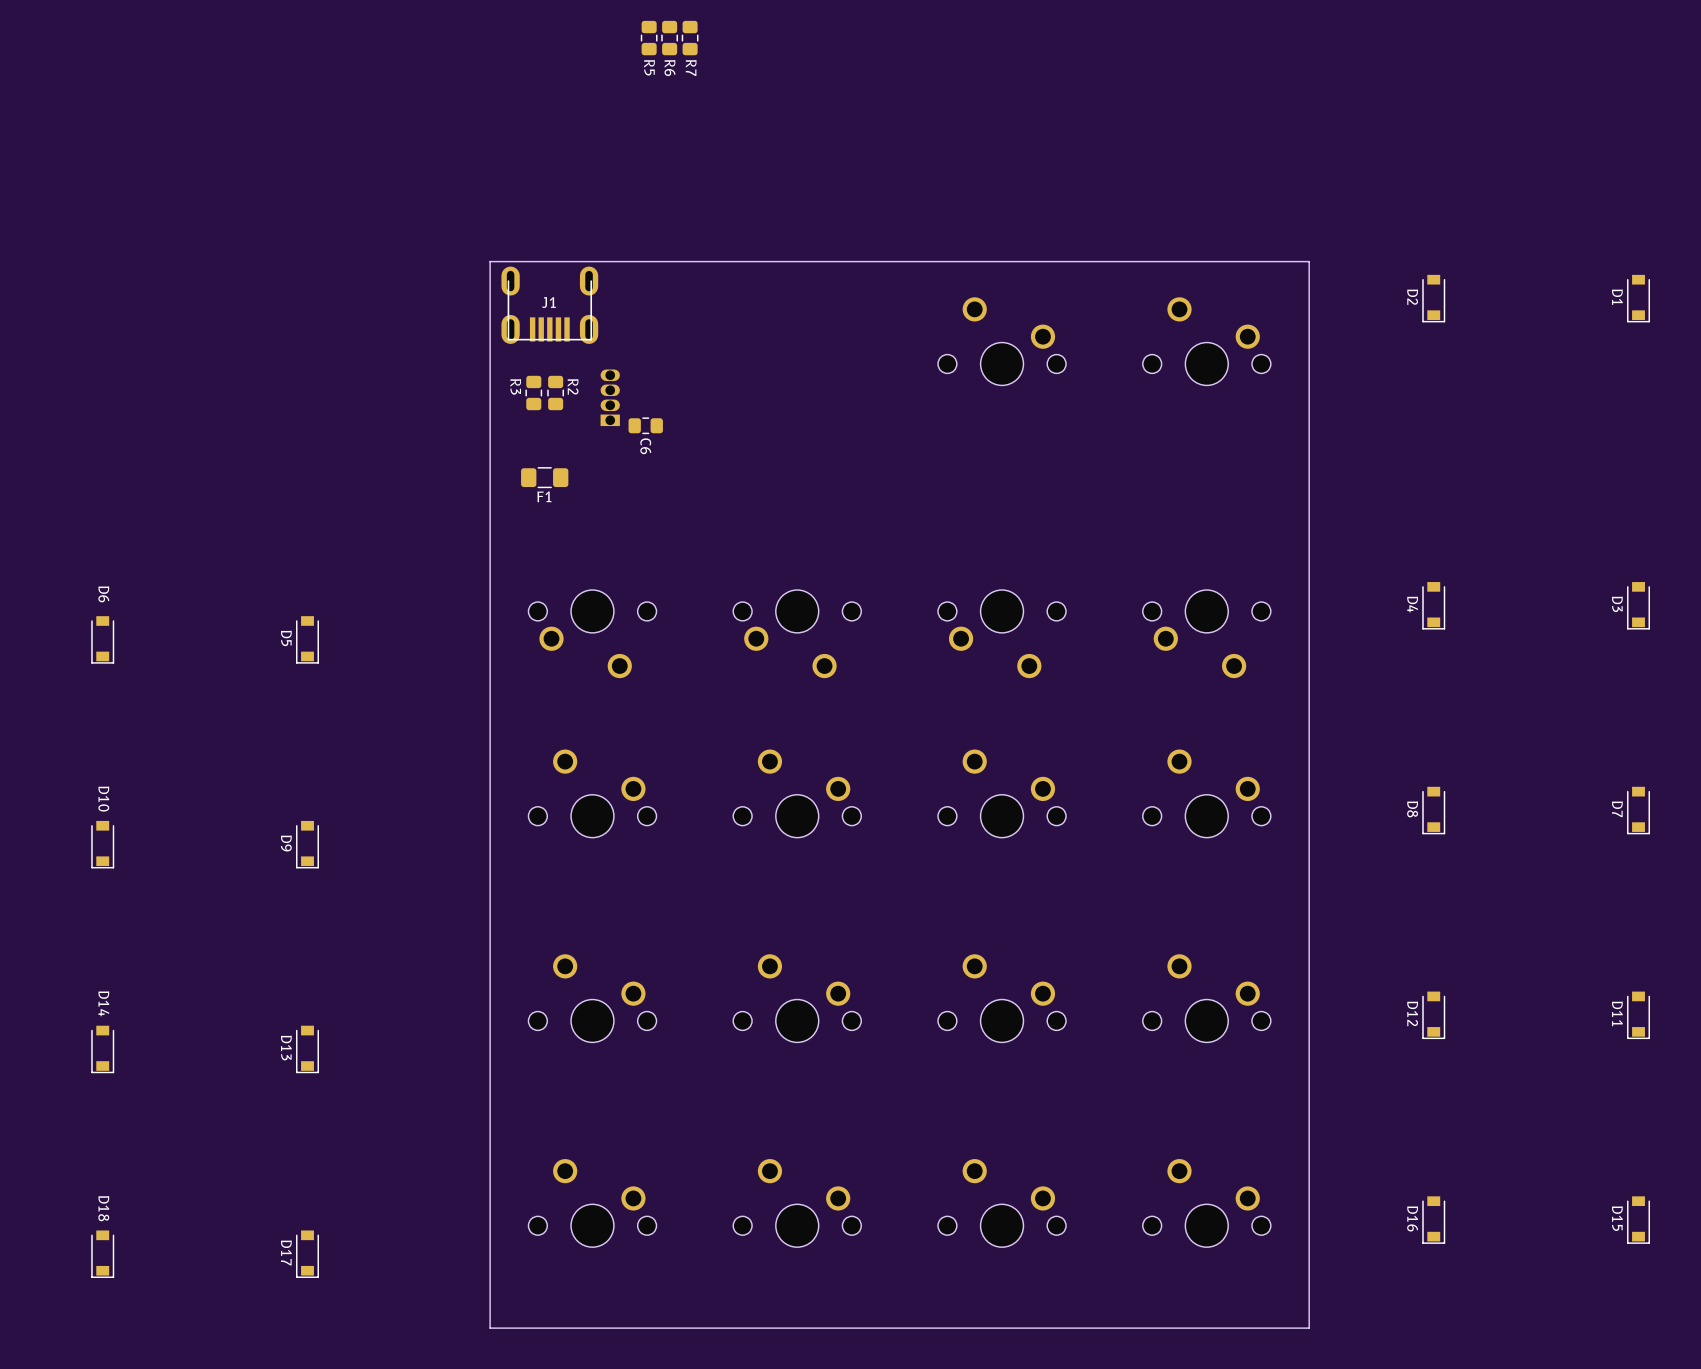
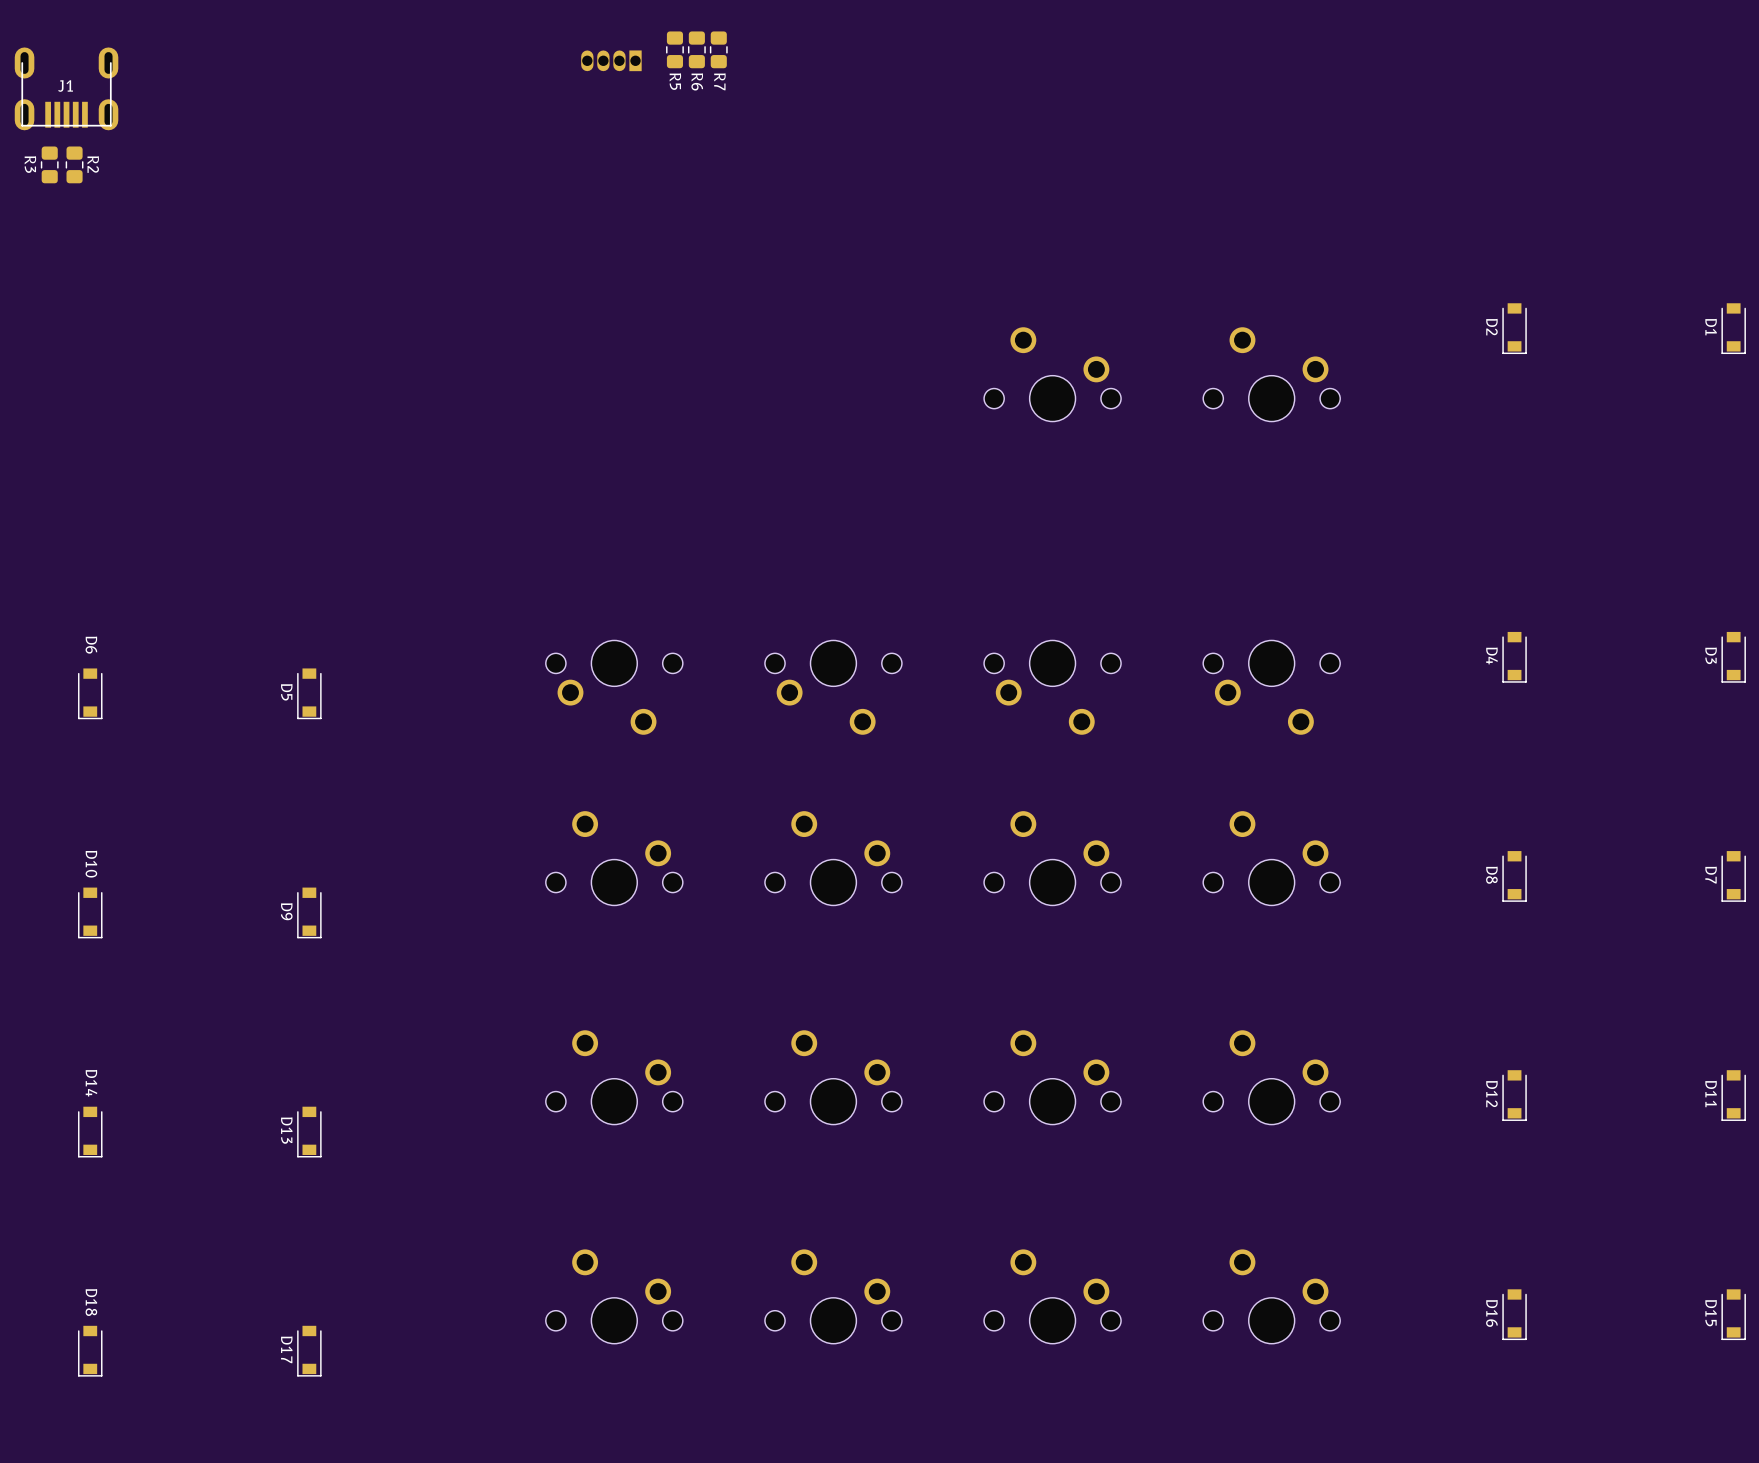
part: none -> (611, 60)
board edge: (1309, 261) (490, 261) (490, 1328) (1309, 1328) (1309, 261) -> none
J1 position: (549, 305) -> (66, 88)
R3 name position: R3 (515, 386) -> R3 (30, 164)
R2 name position: R2 (573, 386) -> R2 (93, 164)
R3 position: (533, 393) -> (49, 164)
R2 position: (555, 393) -> (74, 164)
part: (610, 397) -> none
C6: (645, 425) -> none
F1: (544, 477) -> none

